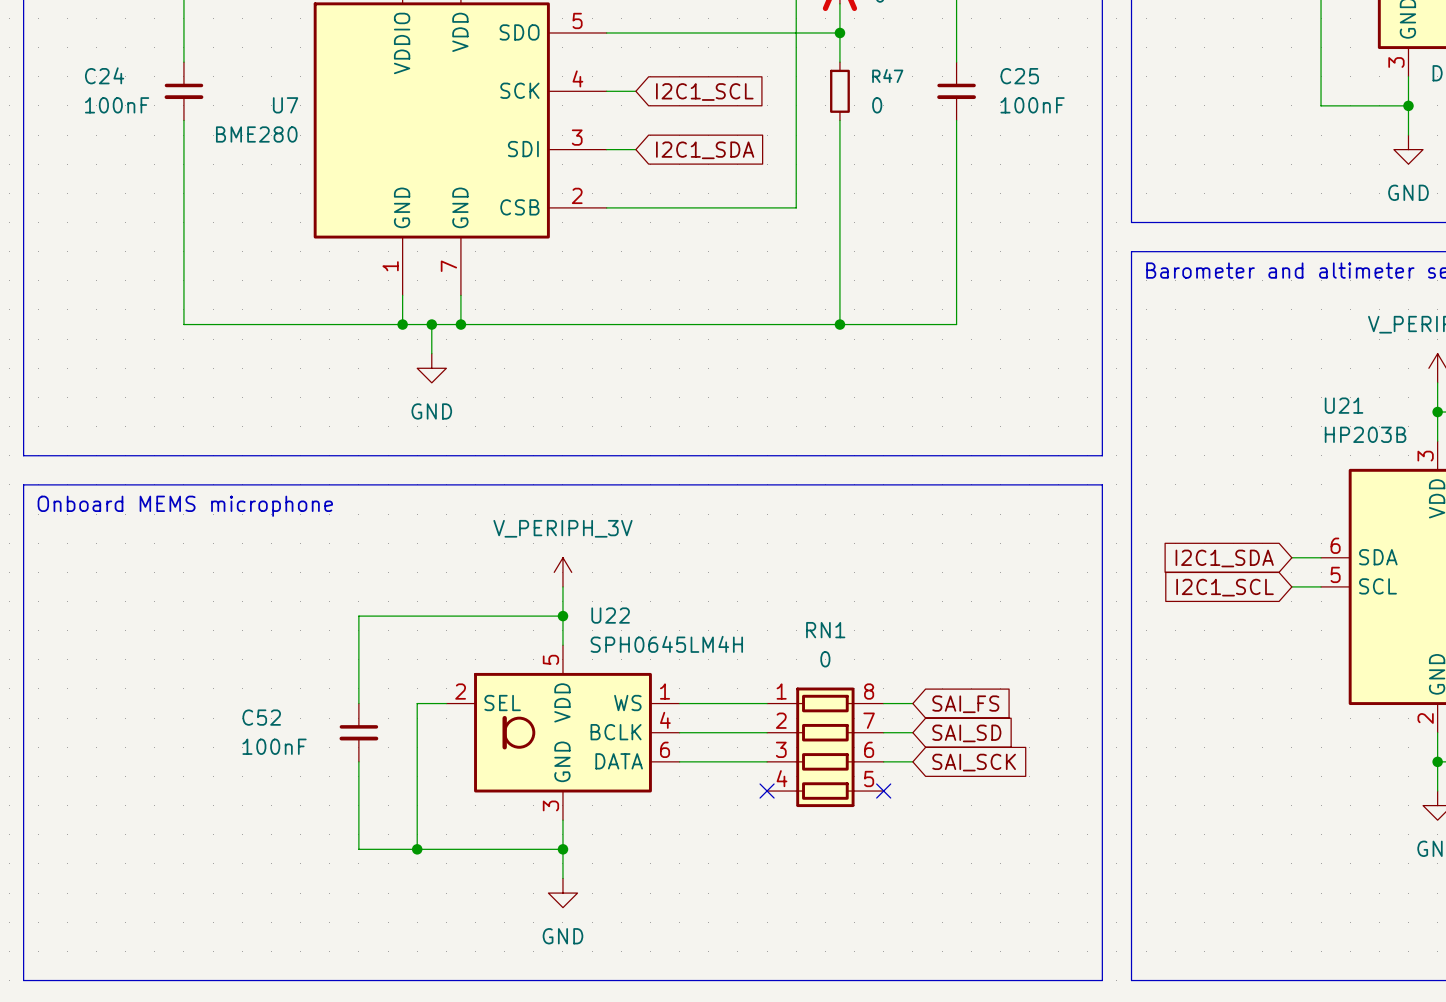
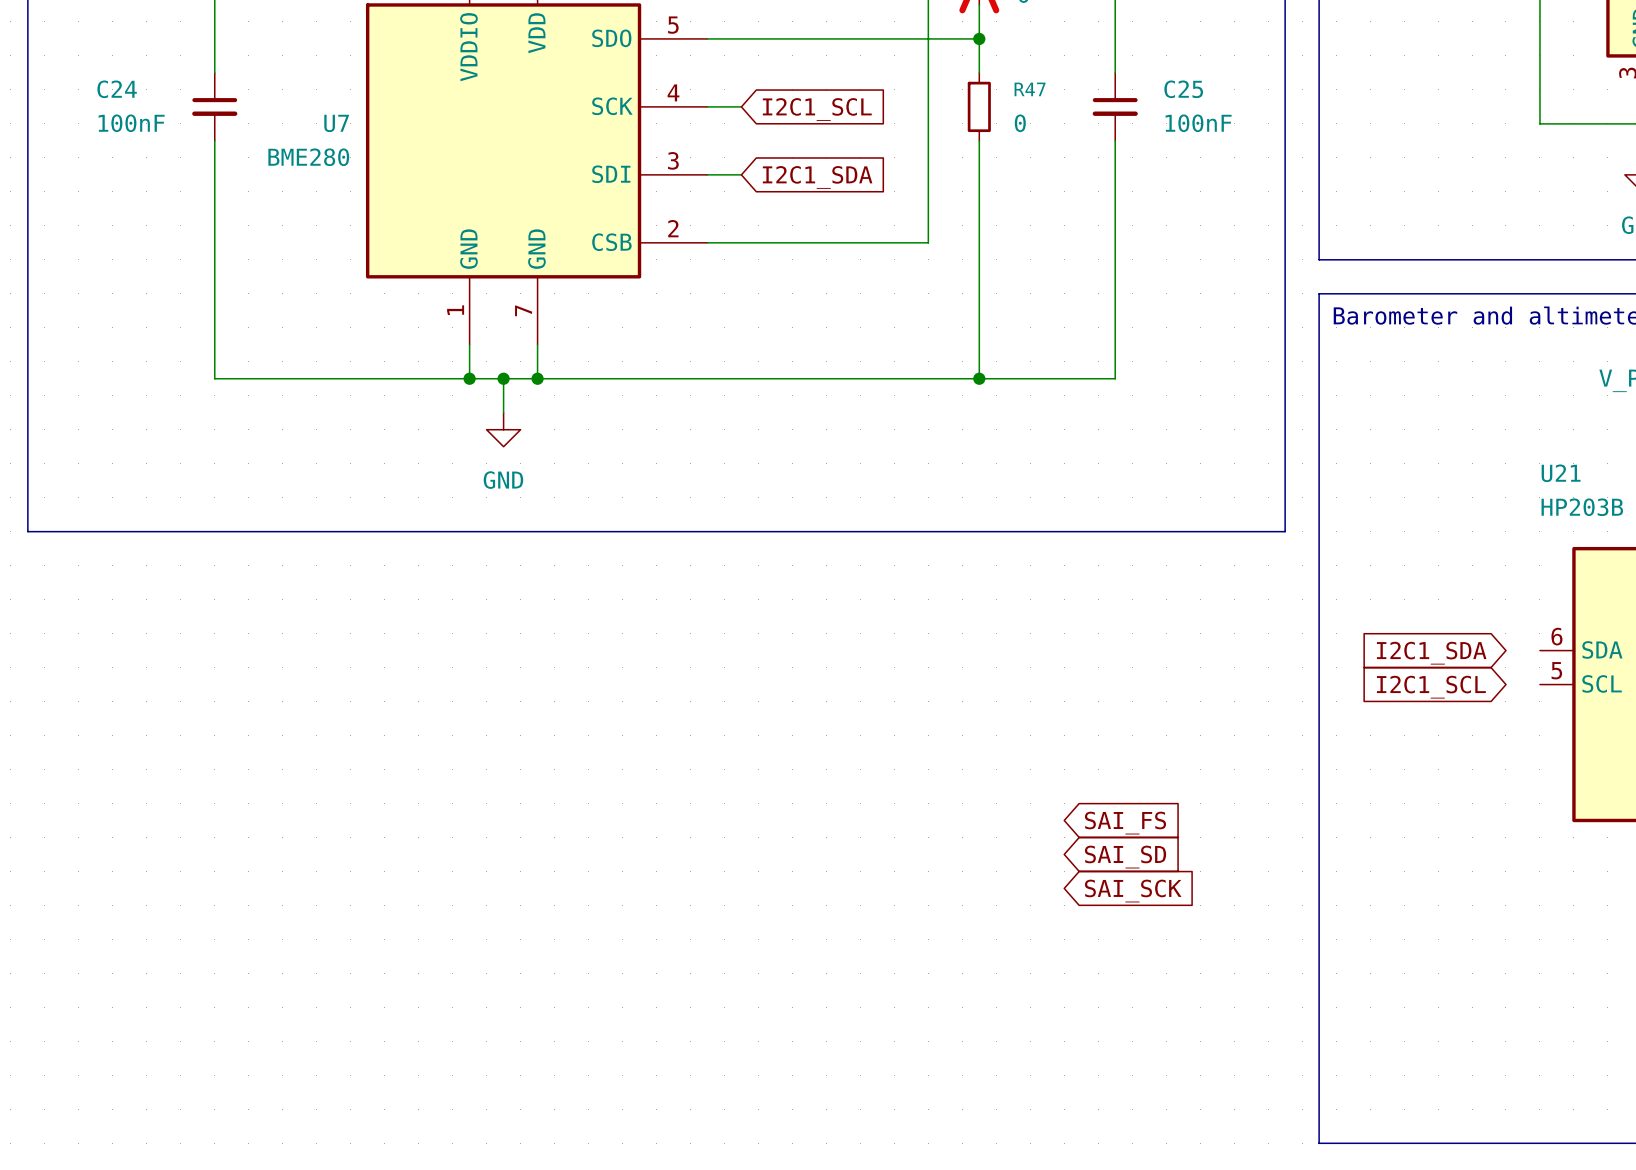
line: (23, 484) (1102, 484) (1102, 980) (23, 980) (23, 484) -> none
text: Onboard MEMS microphone (185, 506) -> none
wire: (1291, 557) (1321, 557) -> none
power symbol: V_PERIPH_3V (562, 572) -> none
wire: (562, 586) (562, 645) -> none
wire: (1291, 586) (1321, 586) -> none
wire: (562, 616) (358, 616) (358, 703) -> none
junction: (562, 616) -> none
wire: (446, 703) (417, 703) (417, 849) -> none
wire: (679, 703) (767, 703) -> none
wire: (883, 703) (912, 703) -> none
C52: 100nF (358, 732) -> none
U22: SPH0645LM4H (562, 732) -> none
wire: (679, 732) (767, 732) -> none
wire: (883, 732) (912, 732) -> none
RN1: 0 (825, 747) -> none
wire: (358, 761) (358, 849) (562, 849) -> none
wire: (679, 761) (767, 761) -> none
wire: (883, 761) (912, 761) -> none
no-connect mark: (767, 791) -> none
no-connect mark: (883, 791) -> none
wire: (562, 820) (562, 878) -> none
junction: (417, 849) -> none
junction: (562, 849) -> none
power symbol: GND (562, 893) -> none

